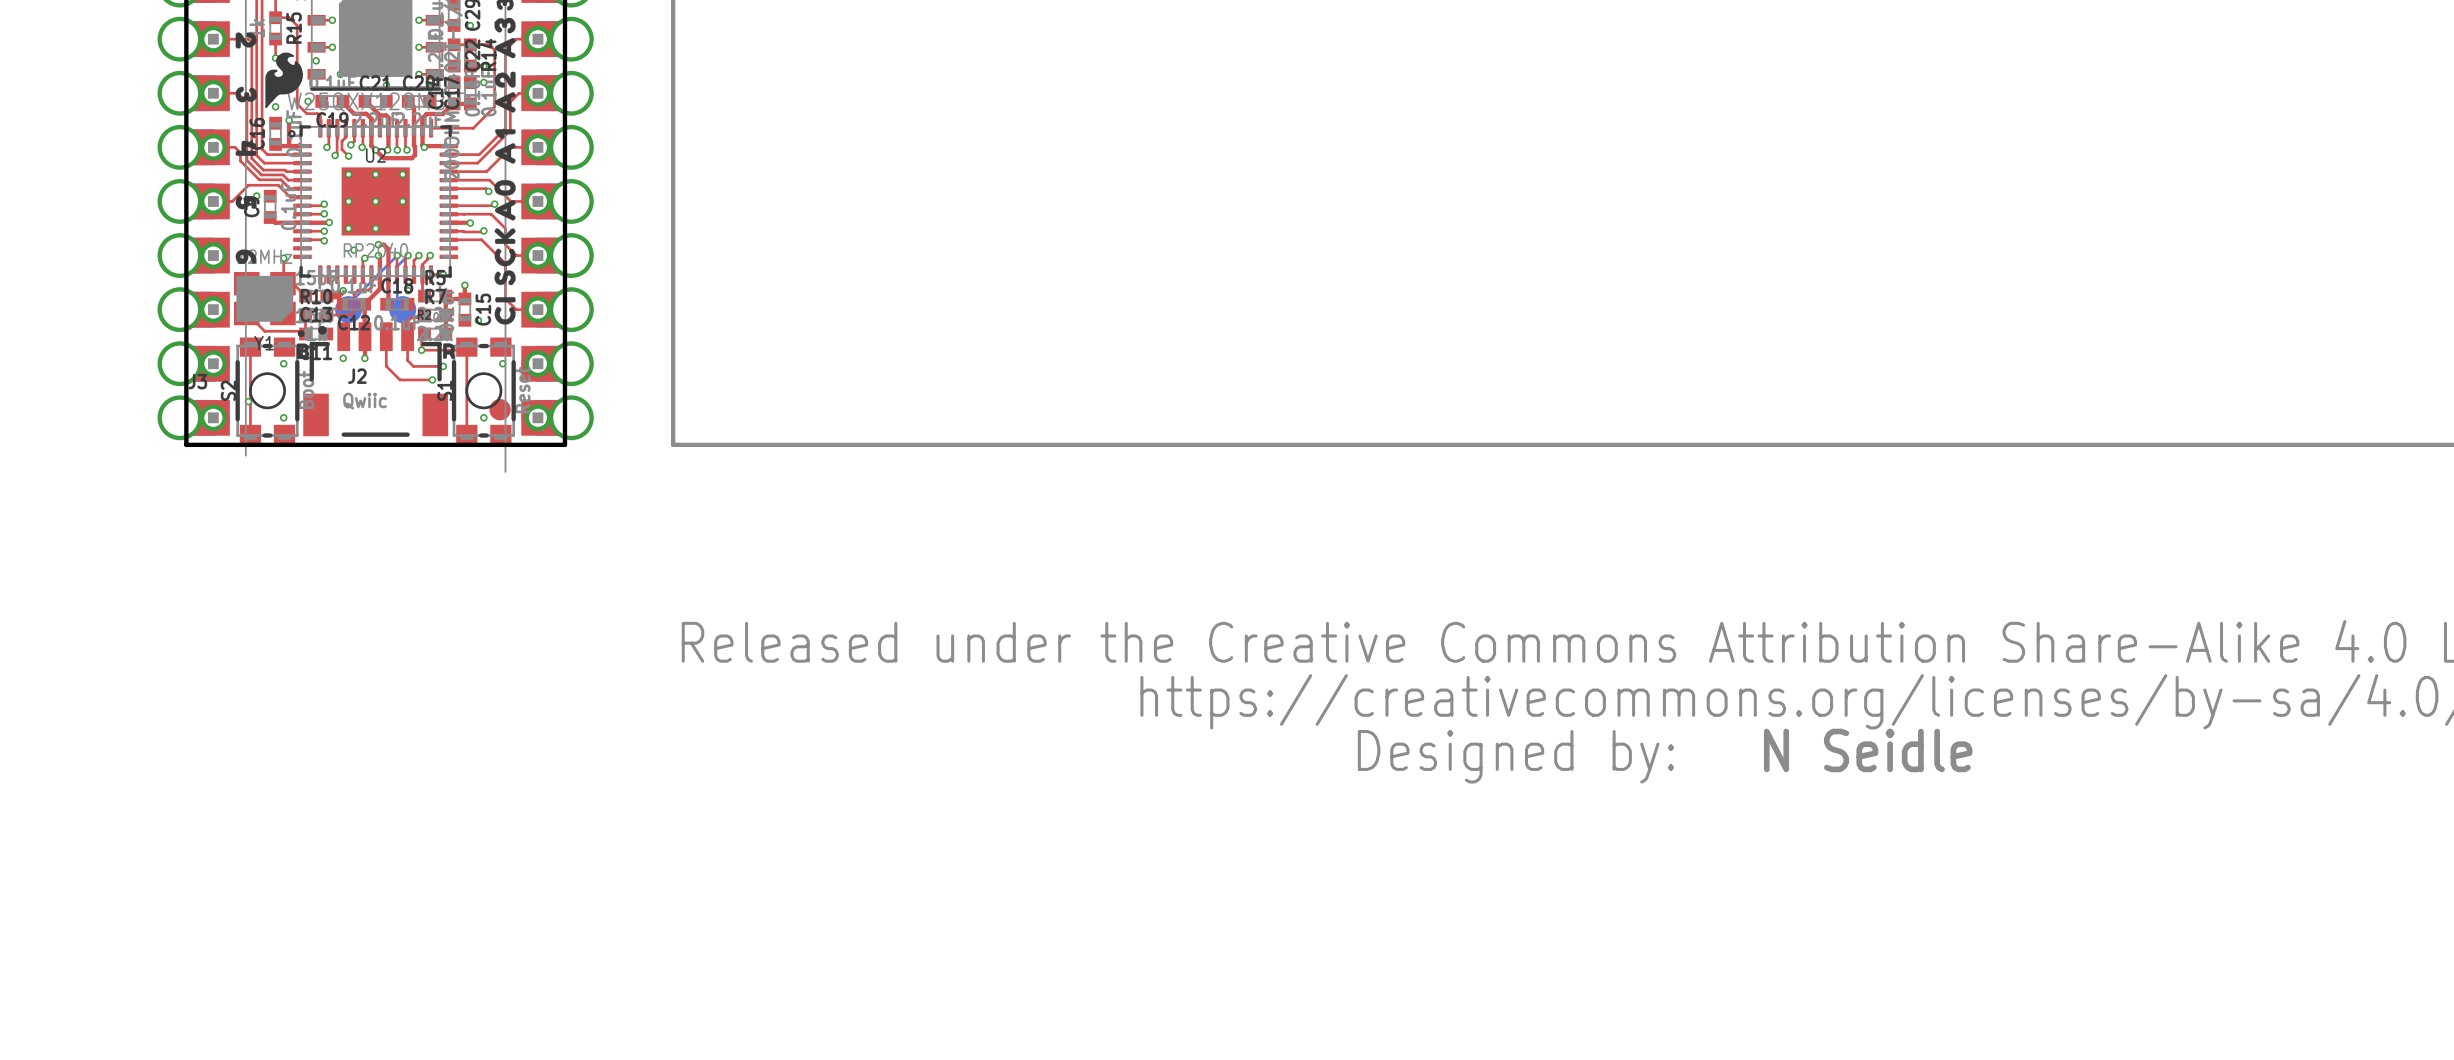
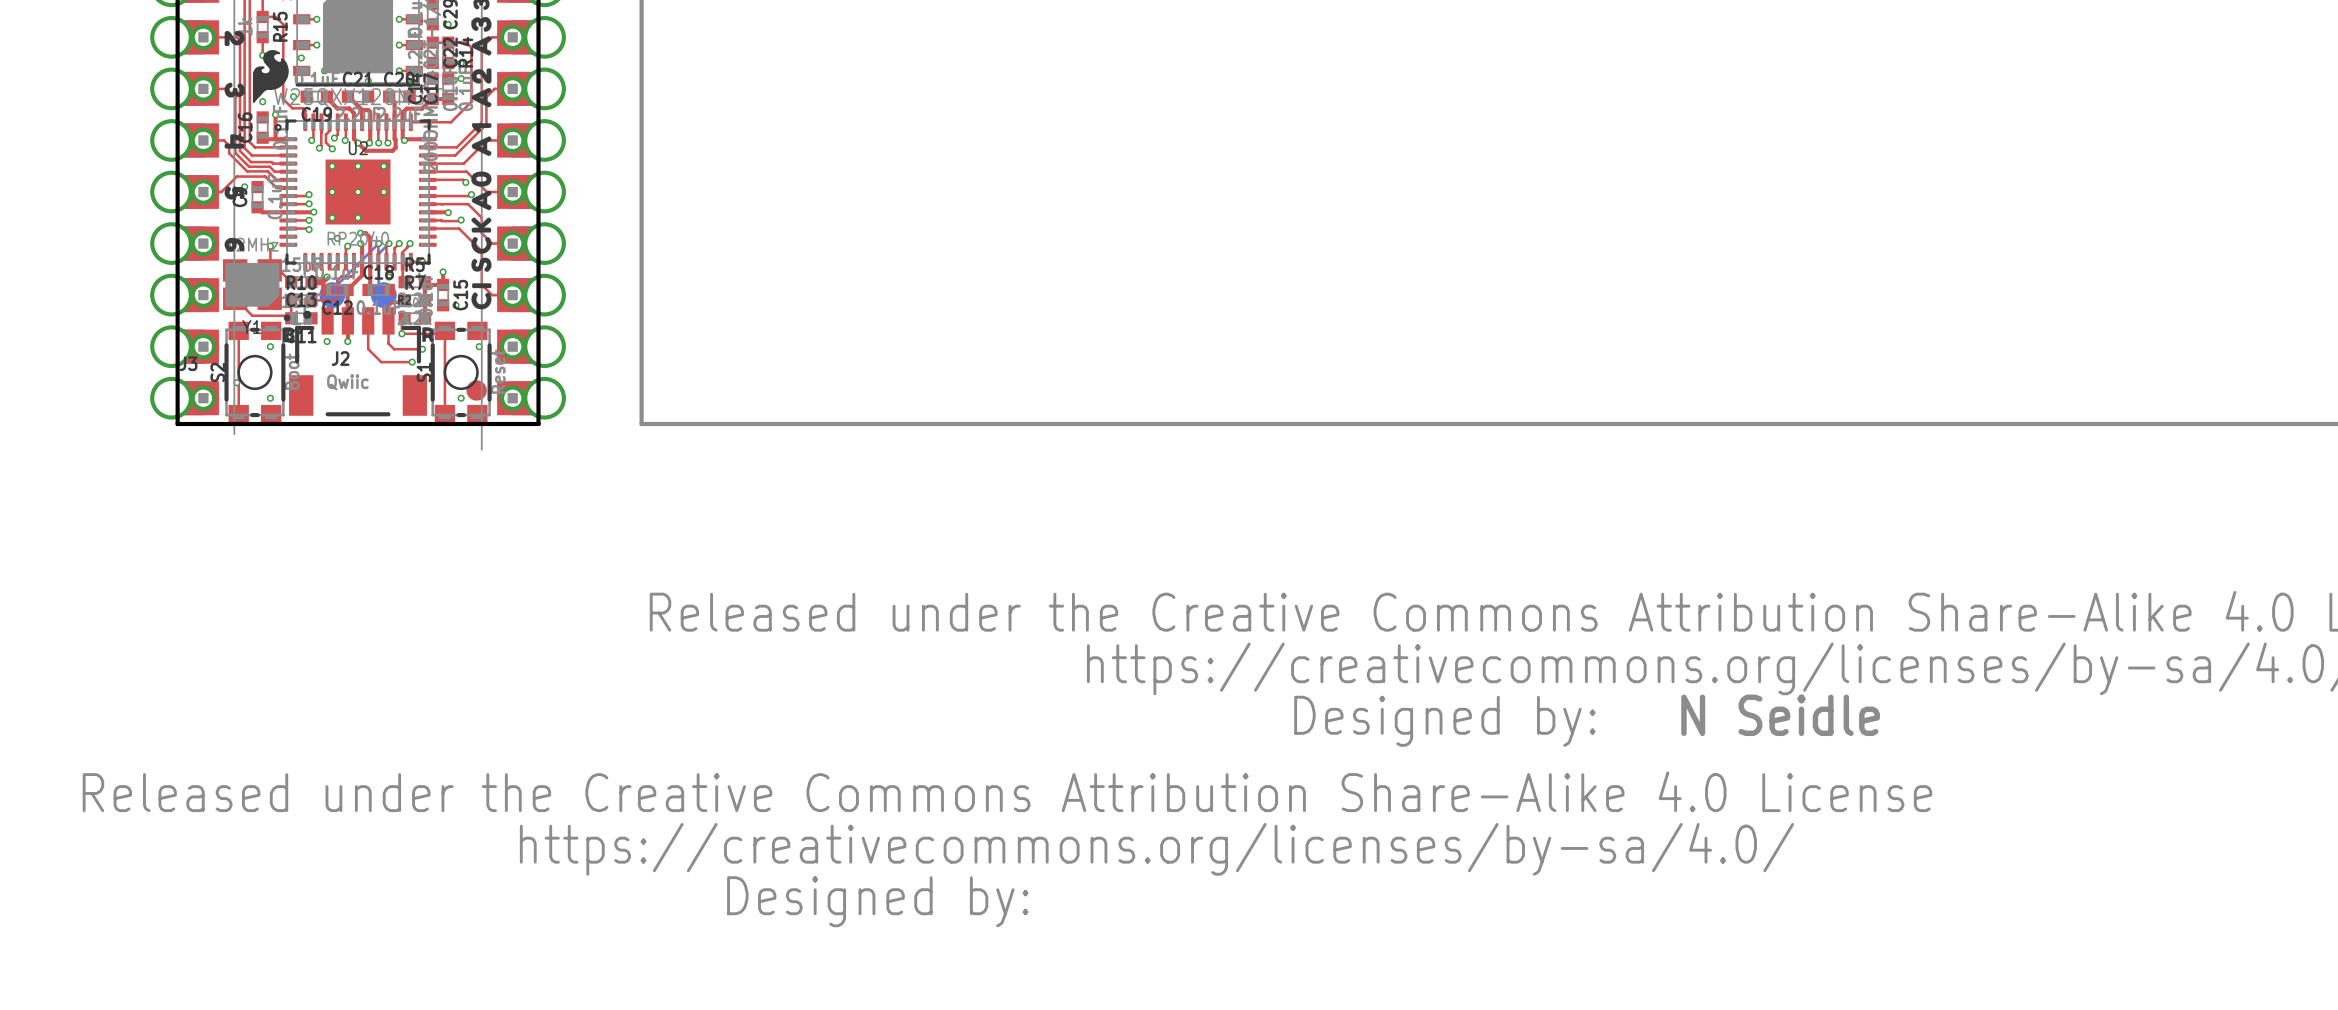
drawing: none -> [82, 771, 1933, 928]

